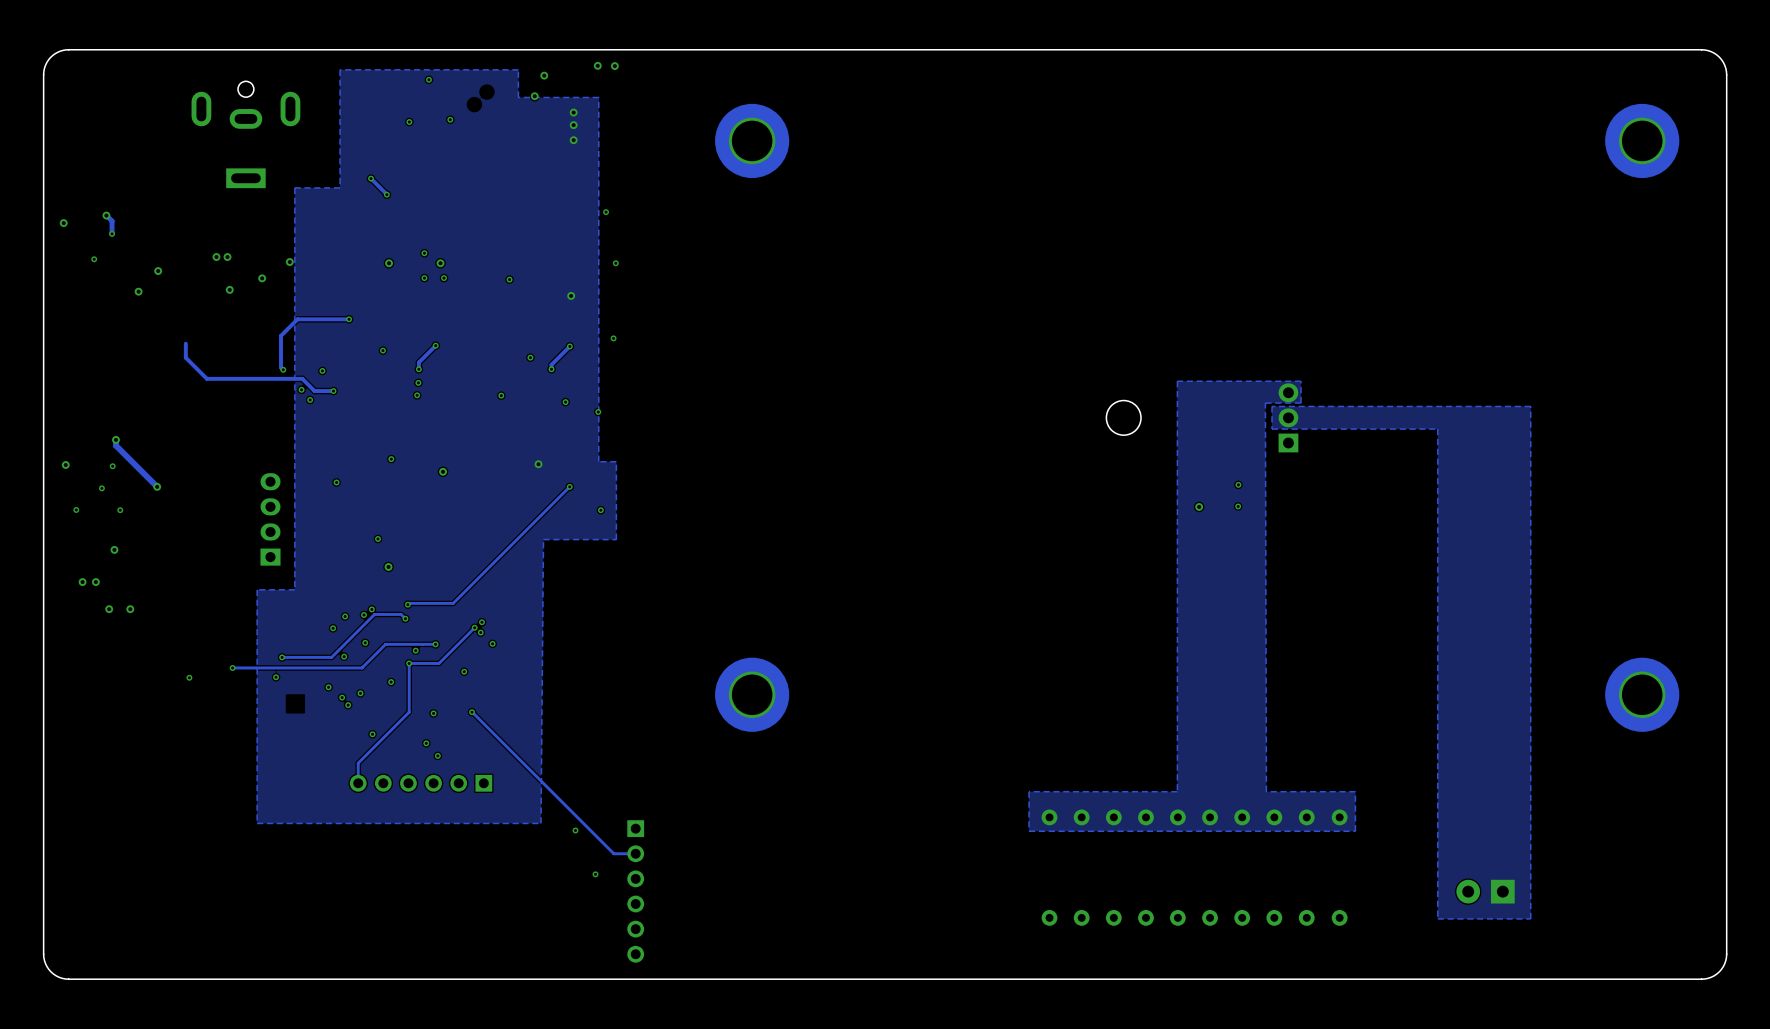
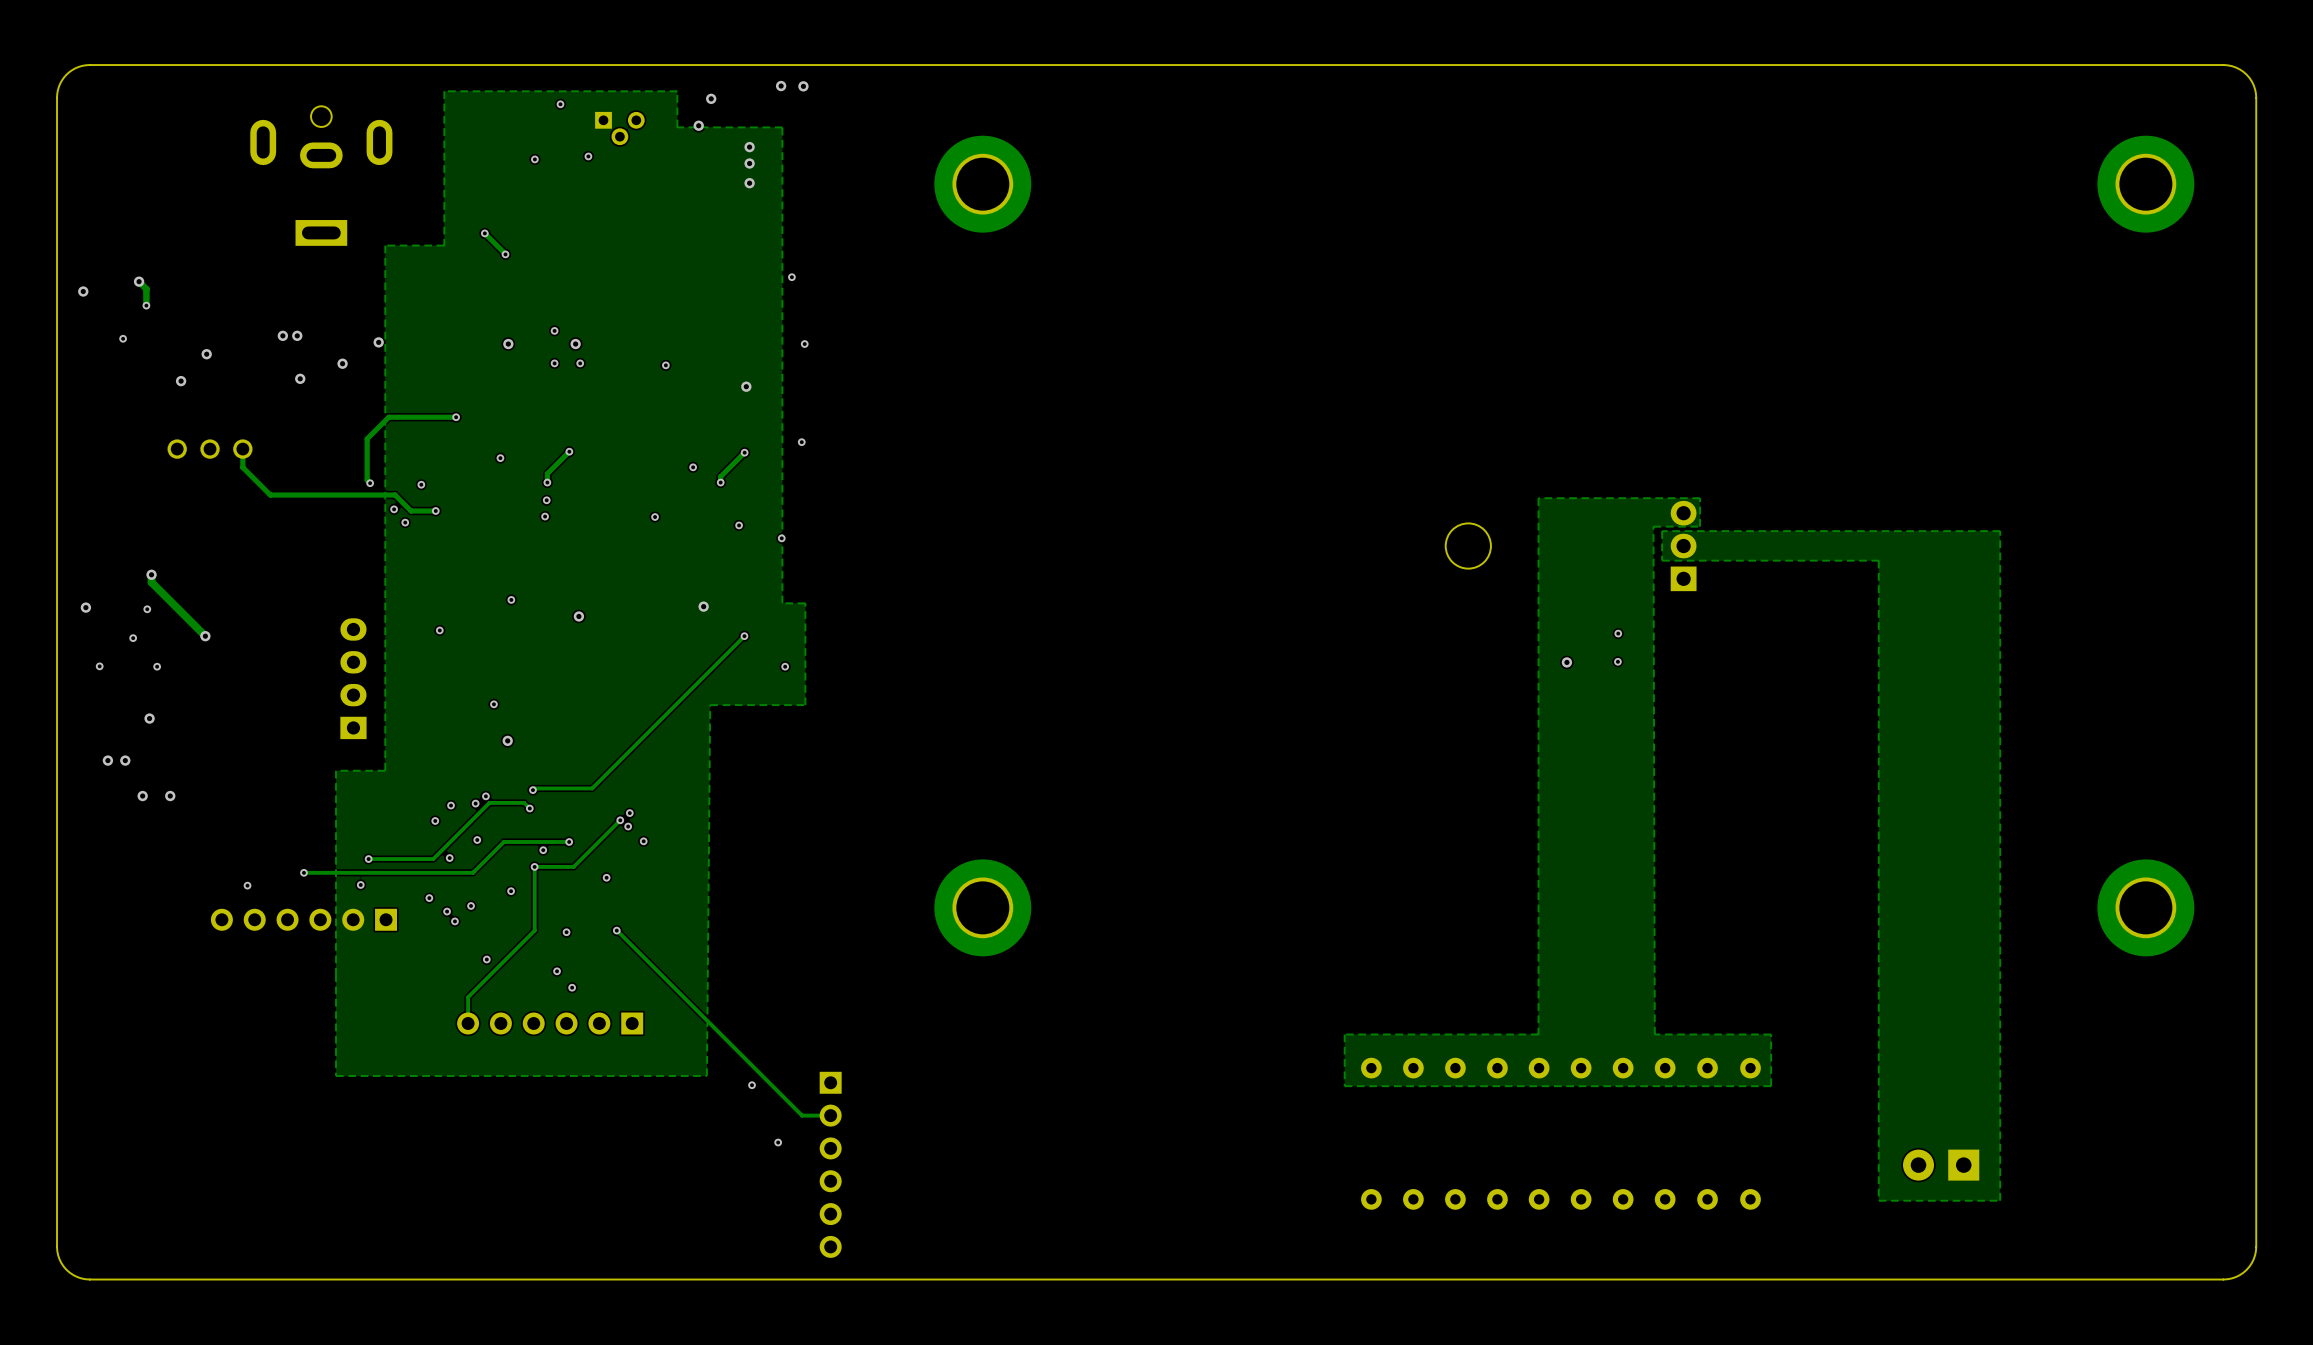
part: none -> (619, 128)
part: none -> (210, 449)
part: none -> (303, 919)

